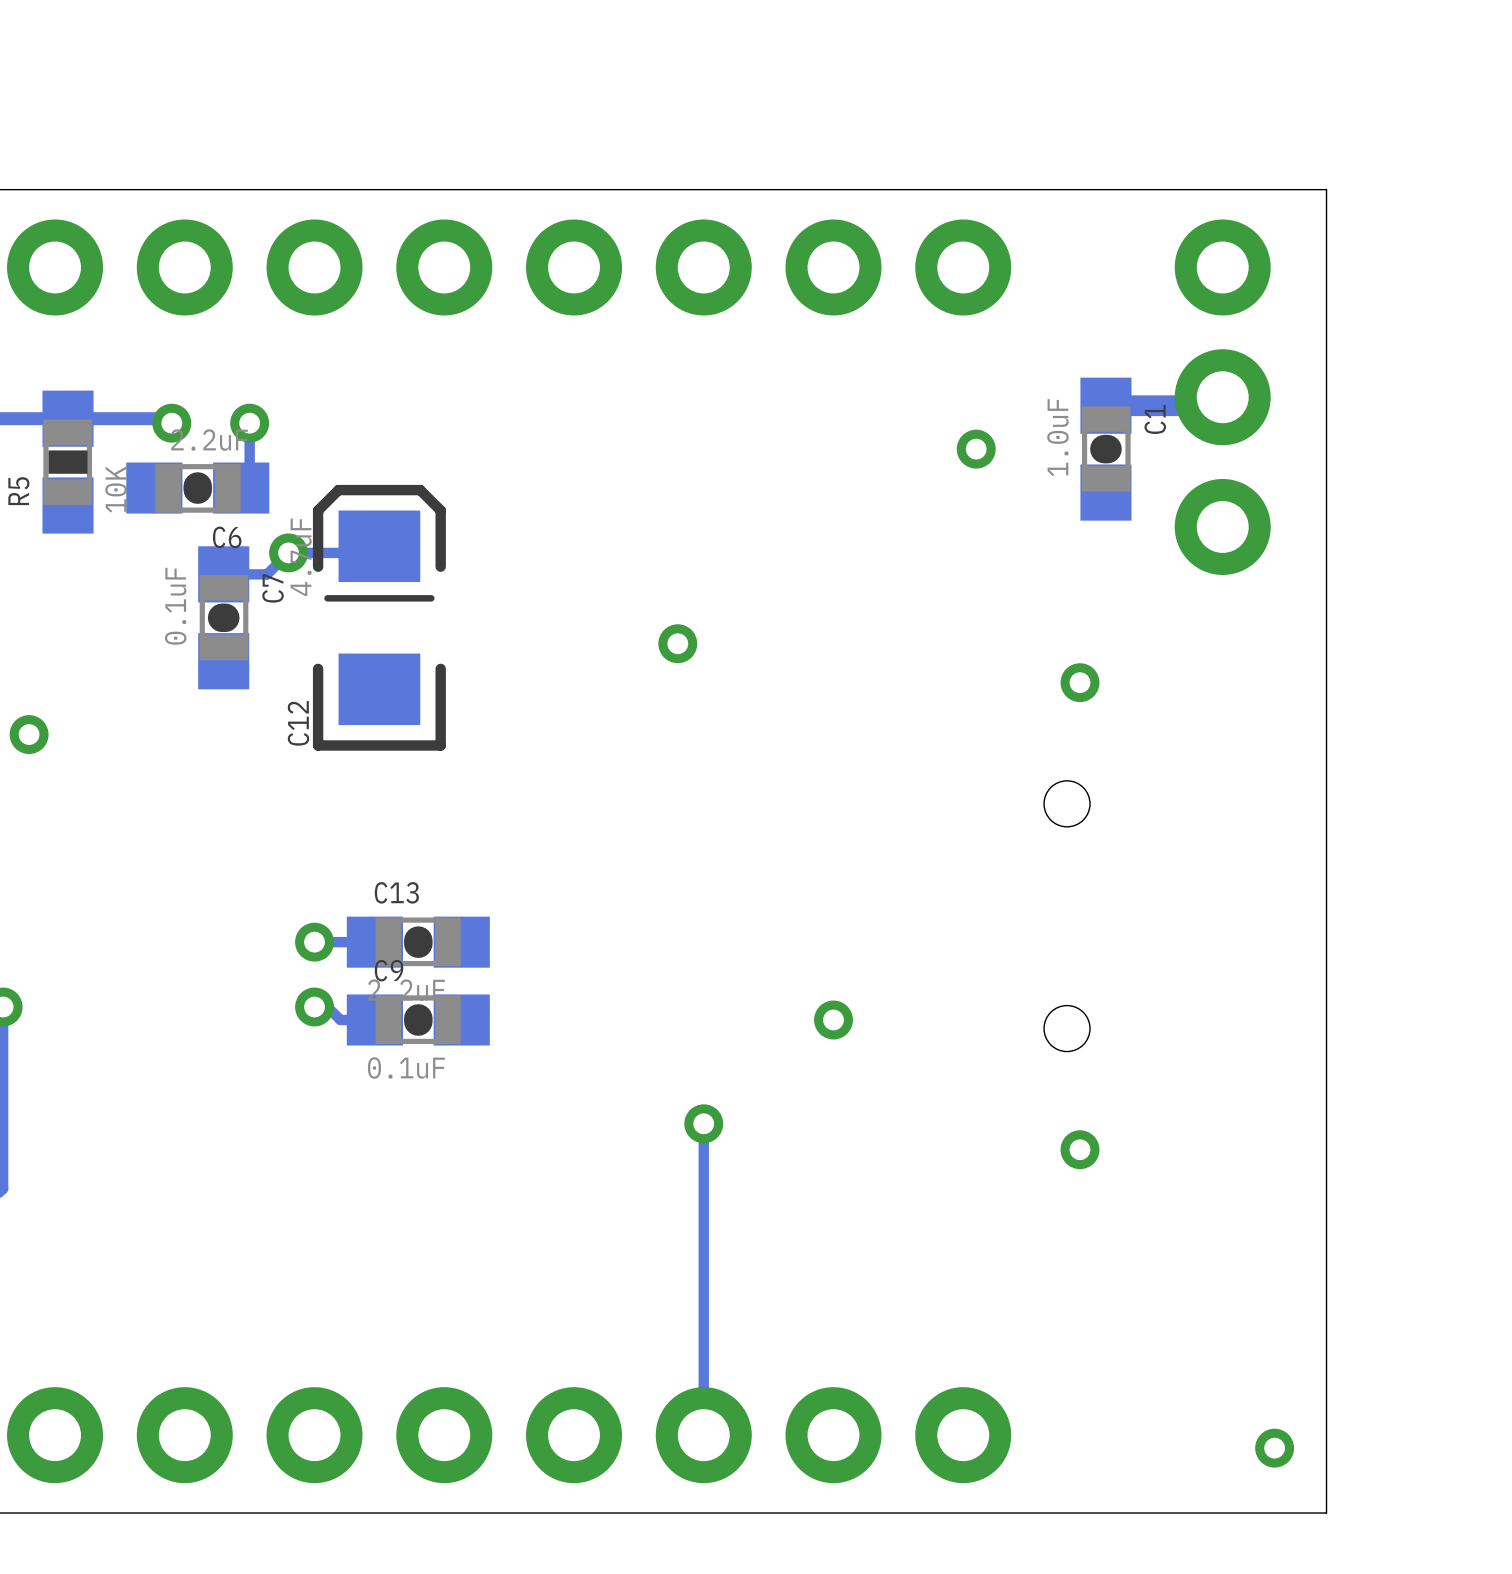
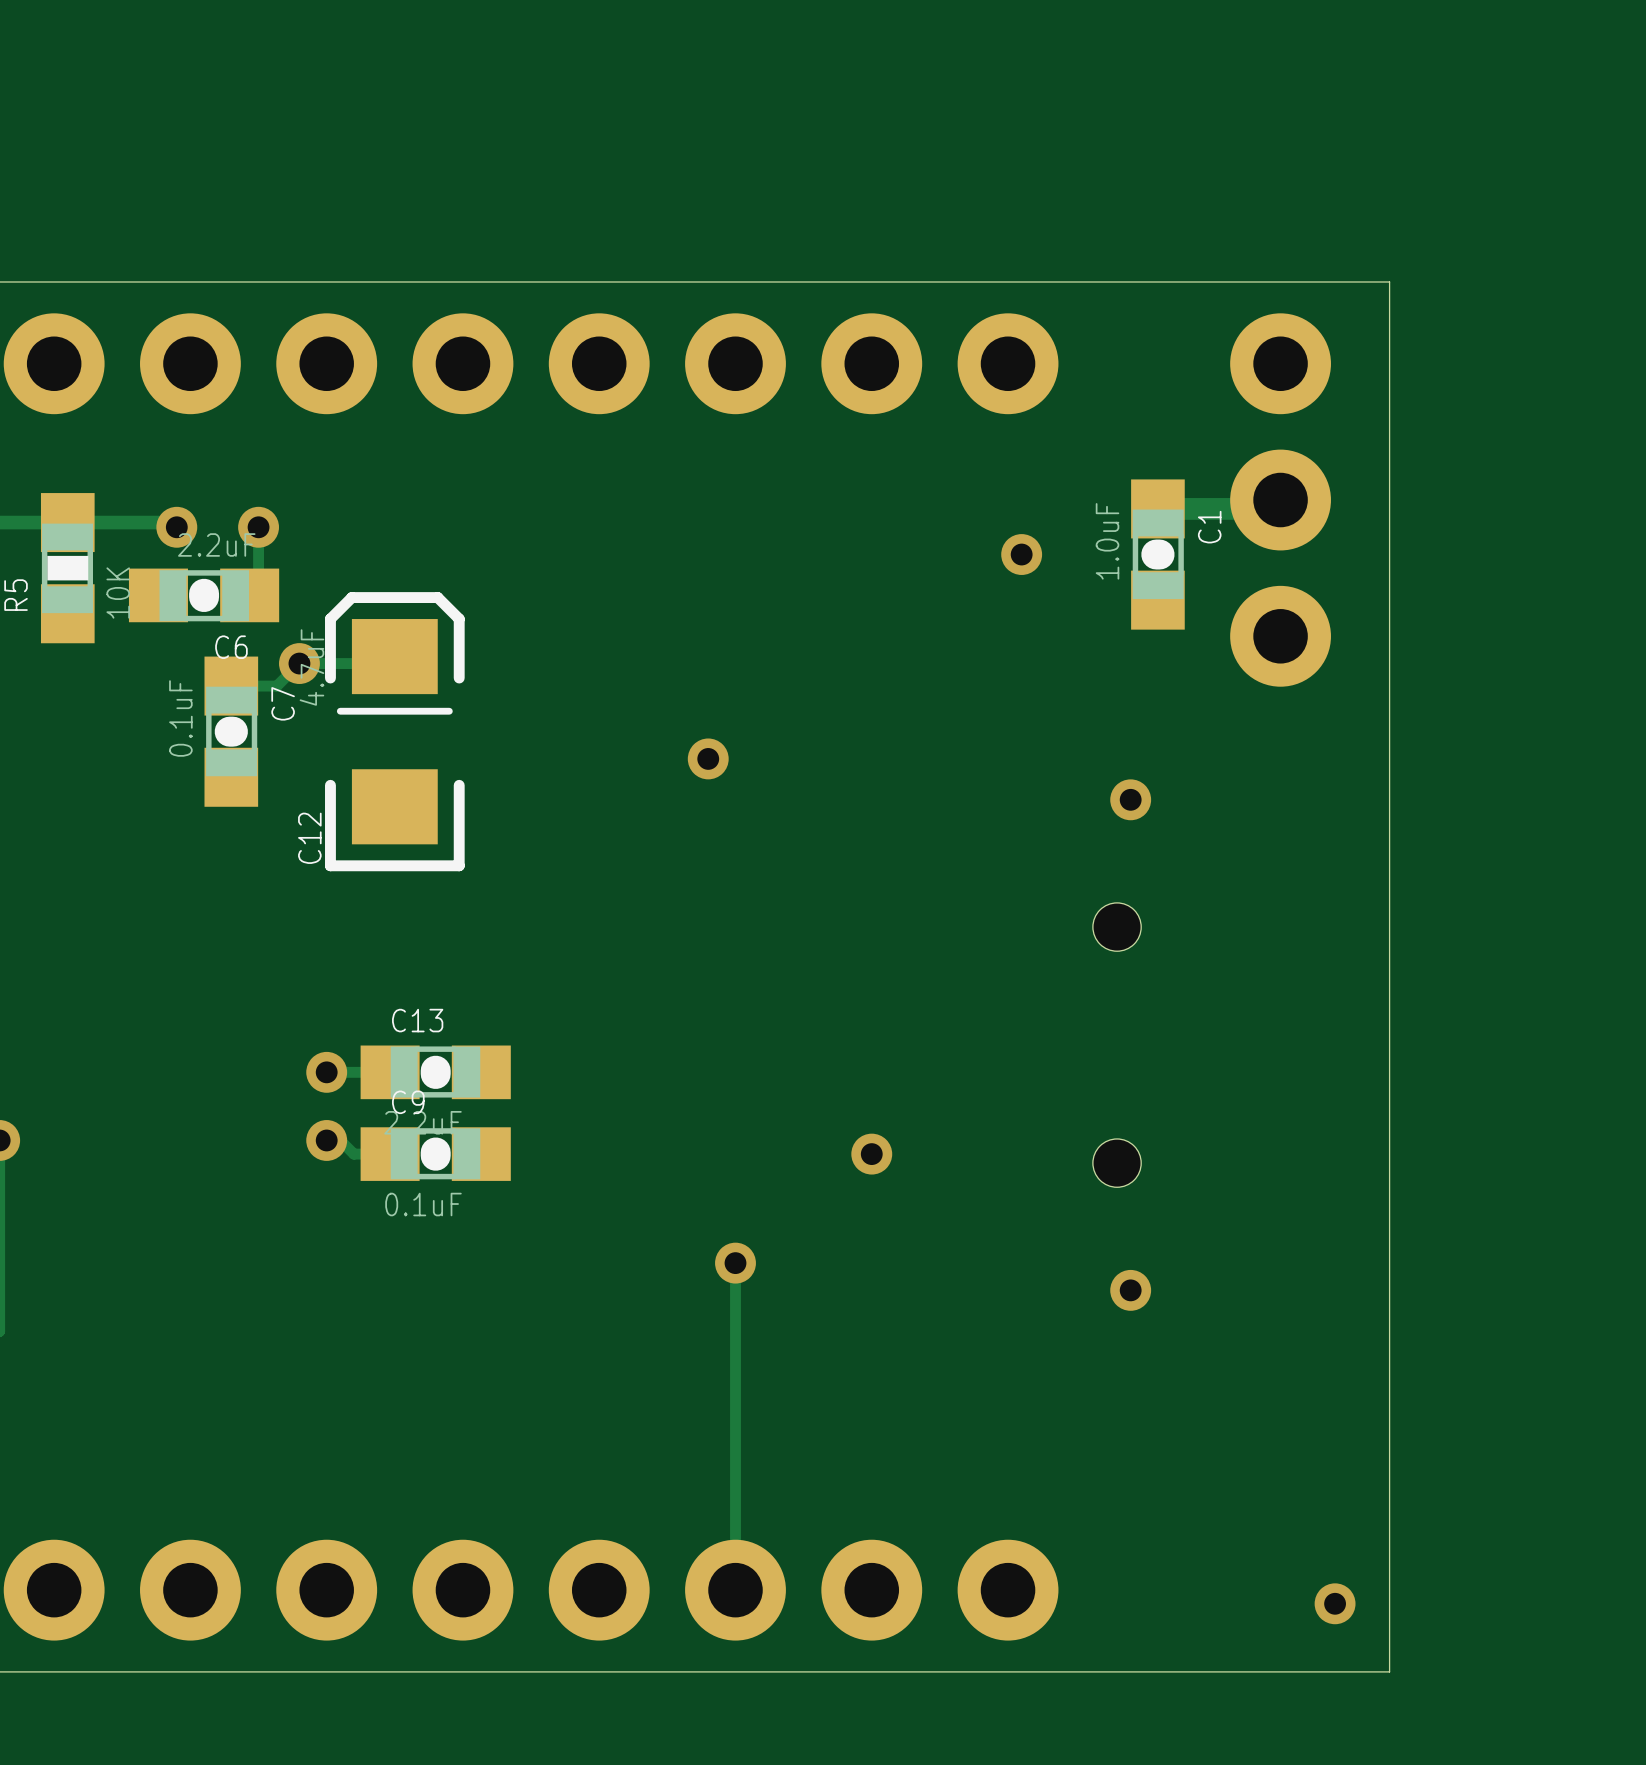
via: (29, 734) -> none

